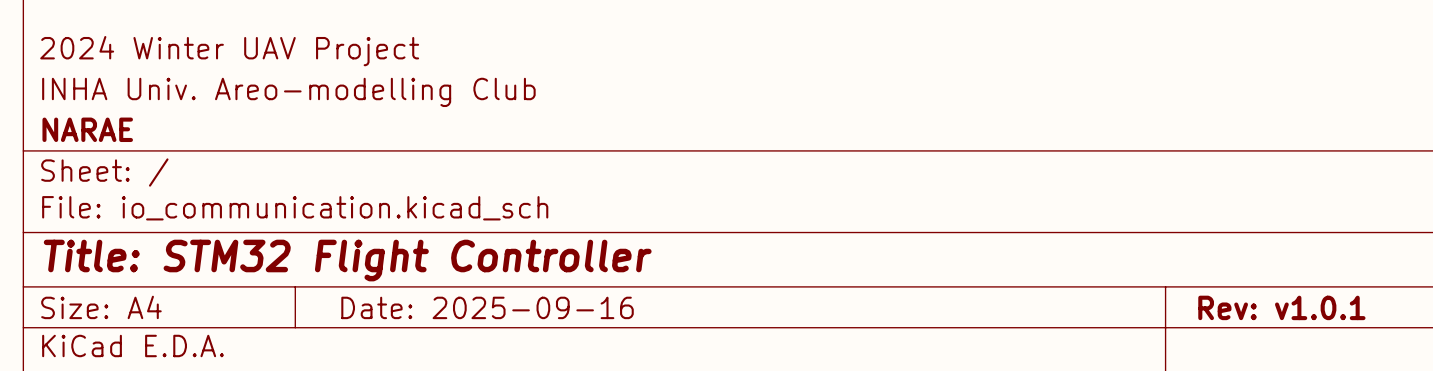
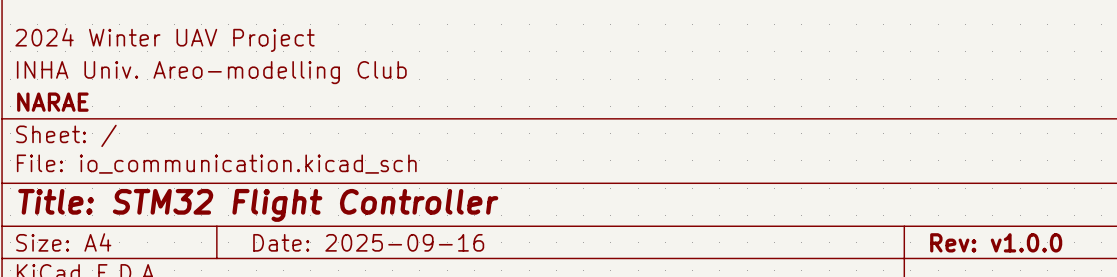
title block: Rev: v1.0.1 (1281, 307) -> Rev: v1.0.0 (996, 242)

